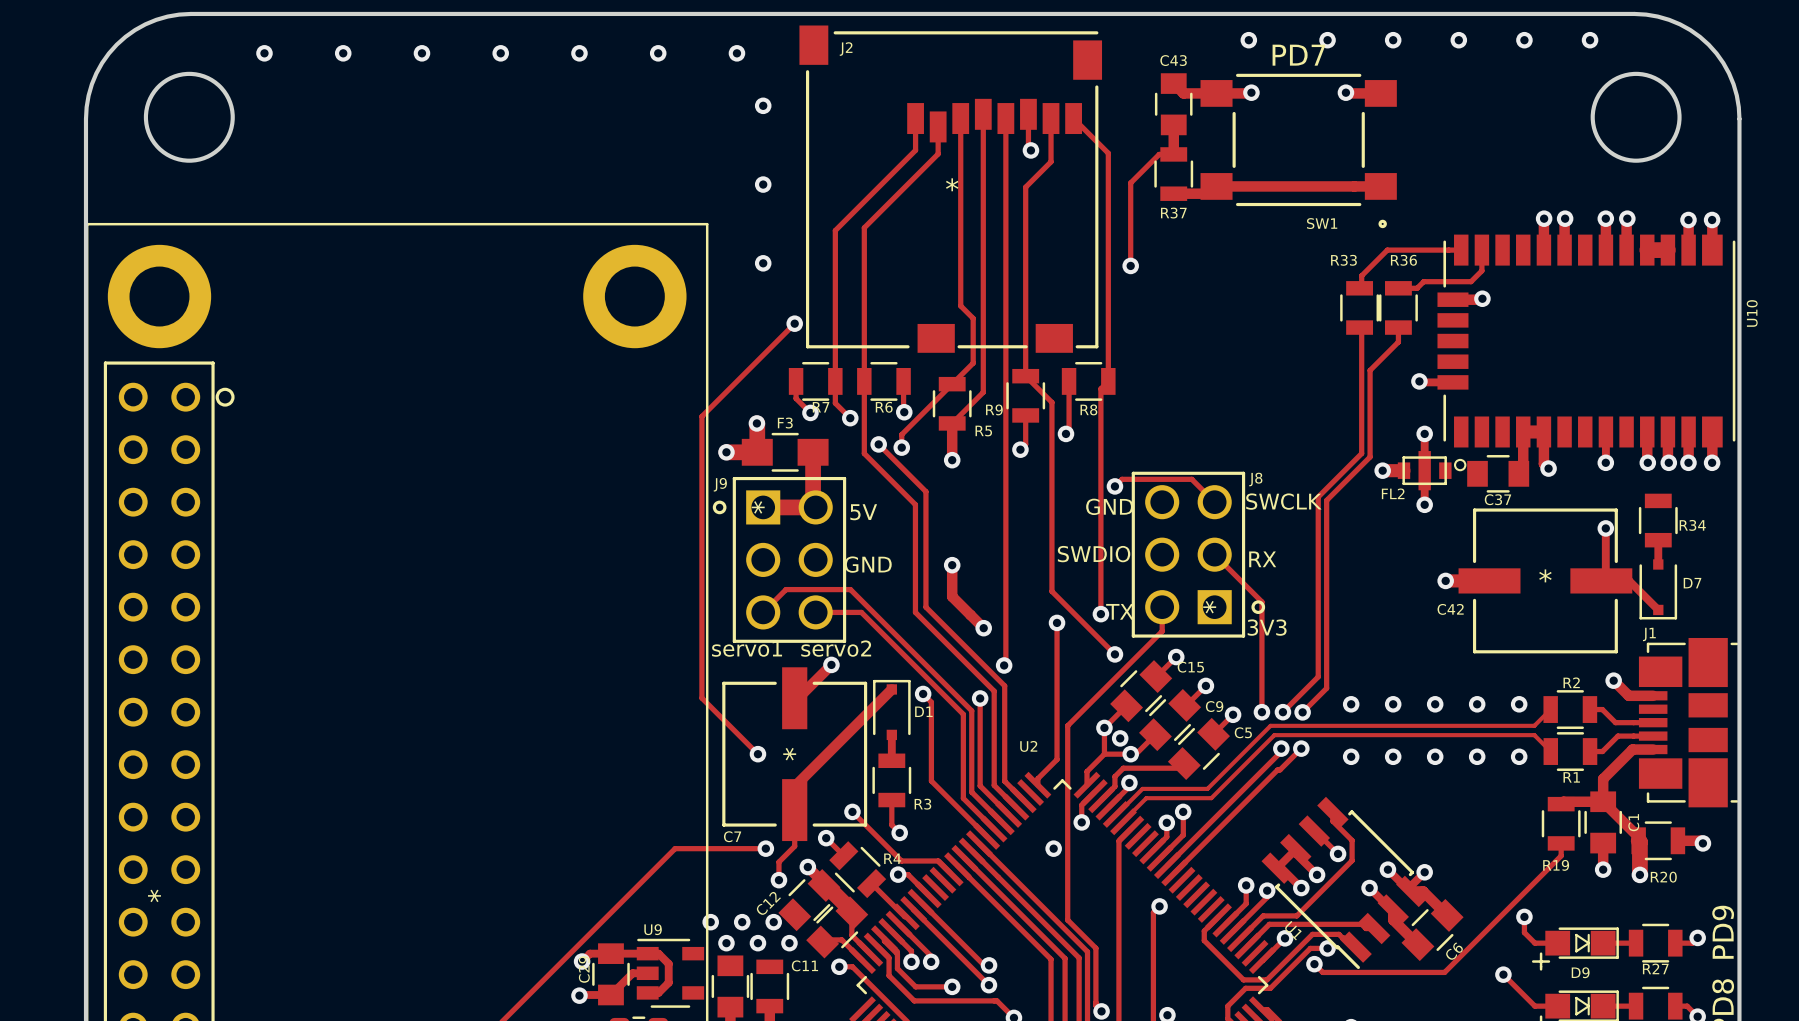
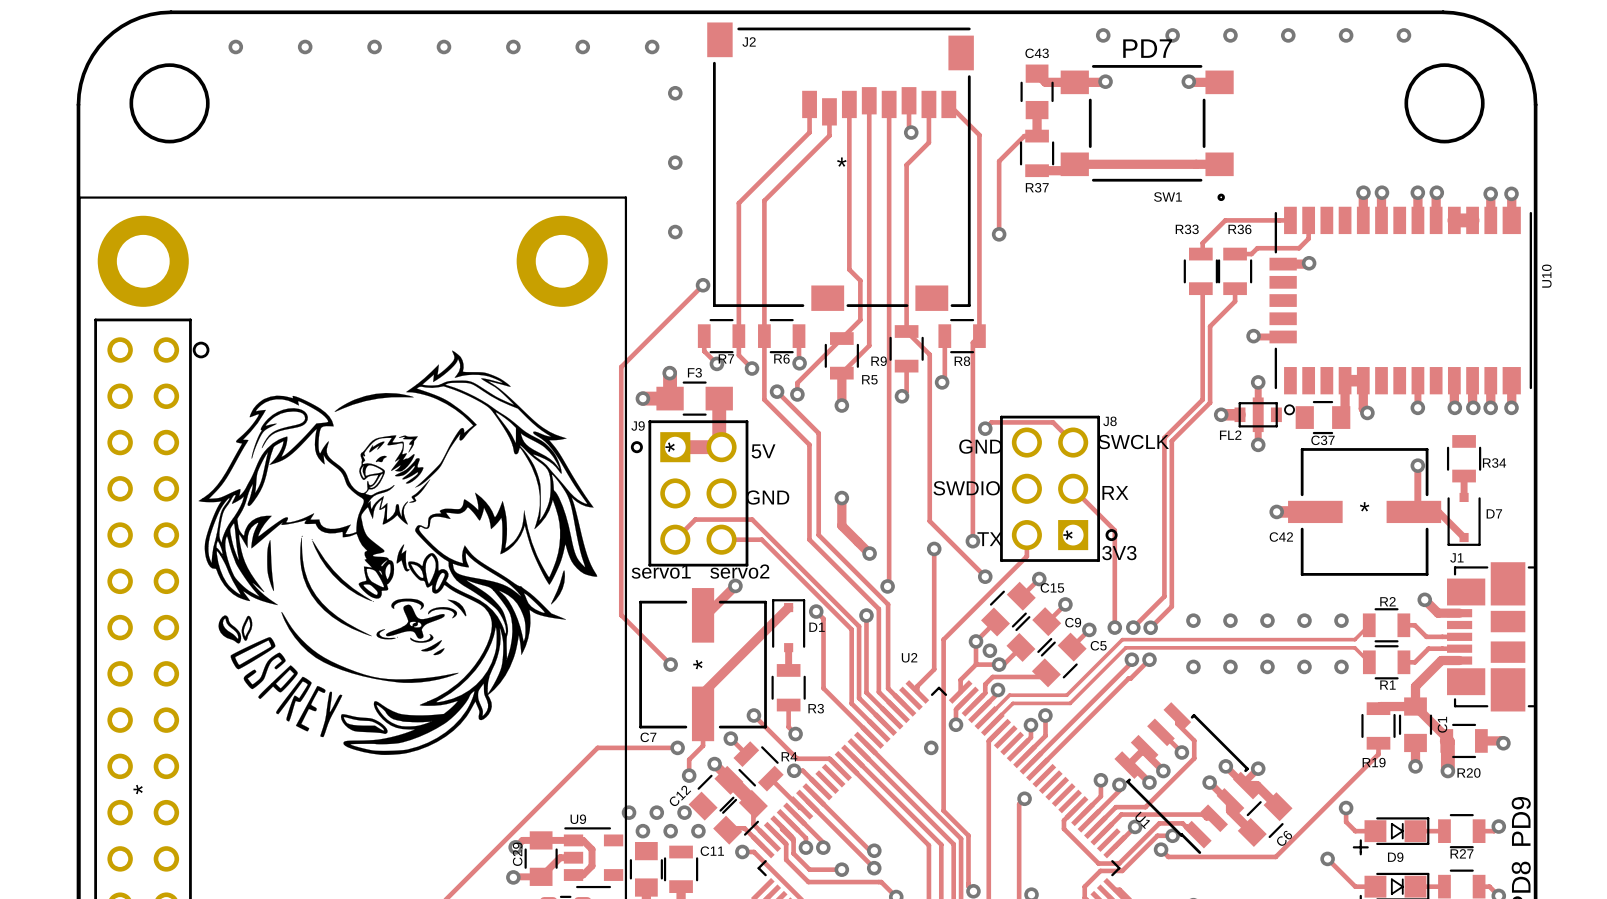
drawing: none -> [198, 350, 598, 755]

